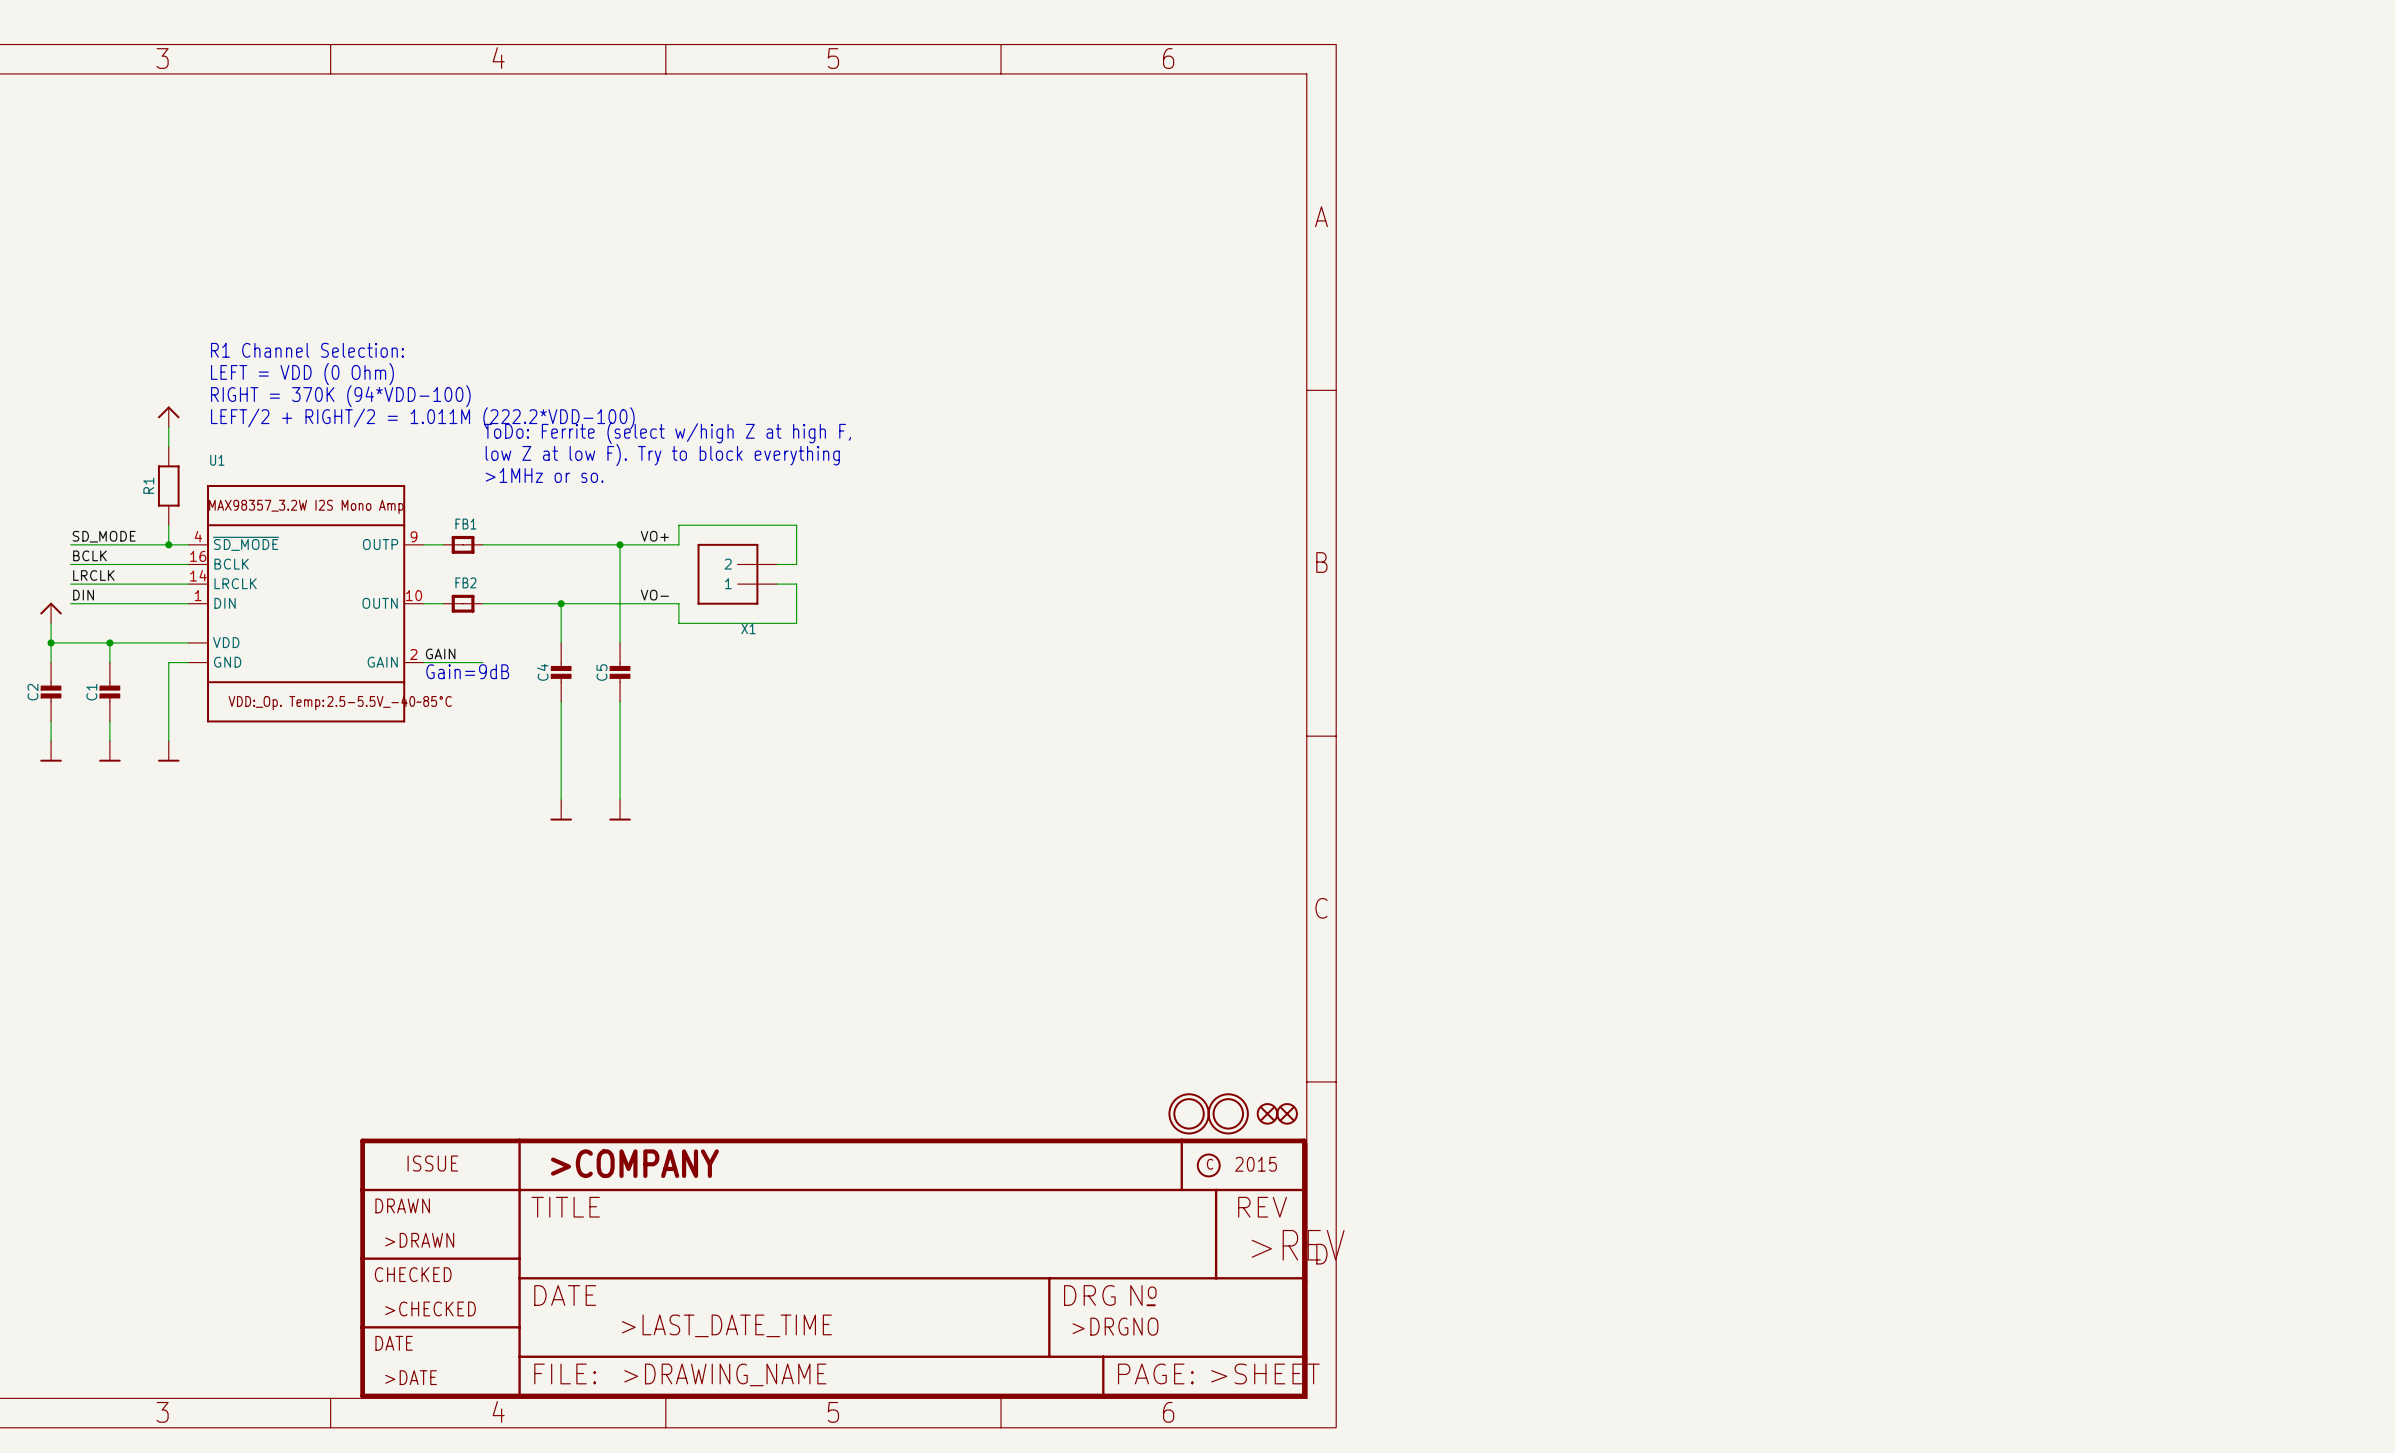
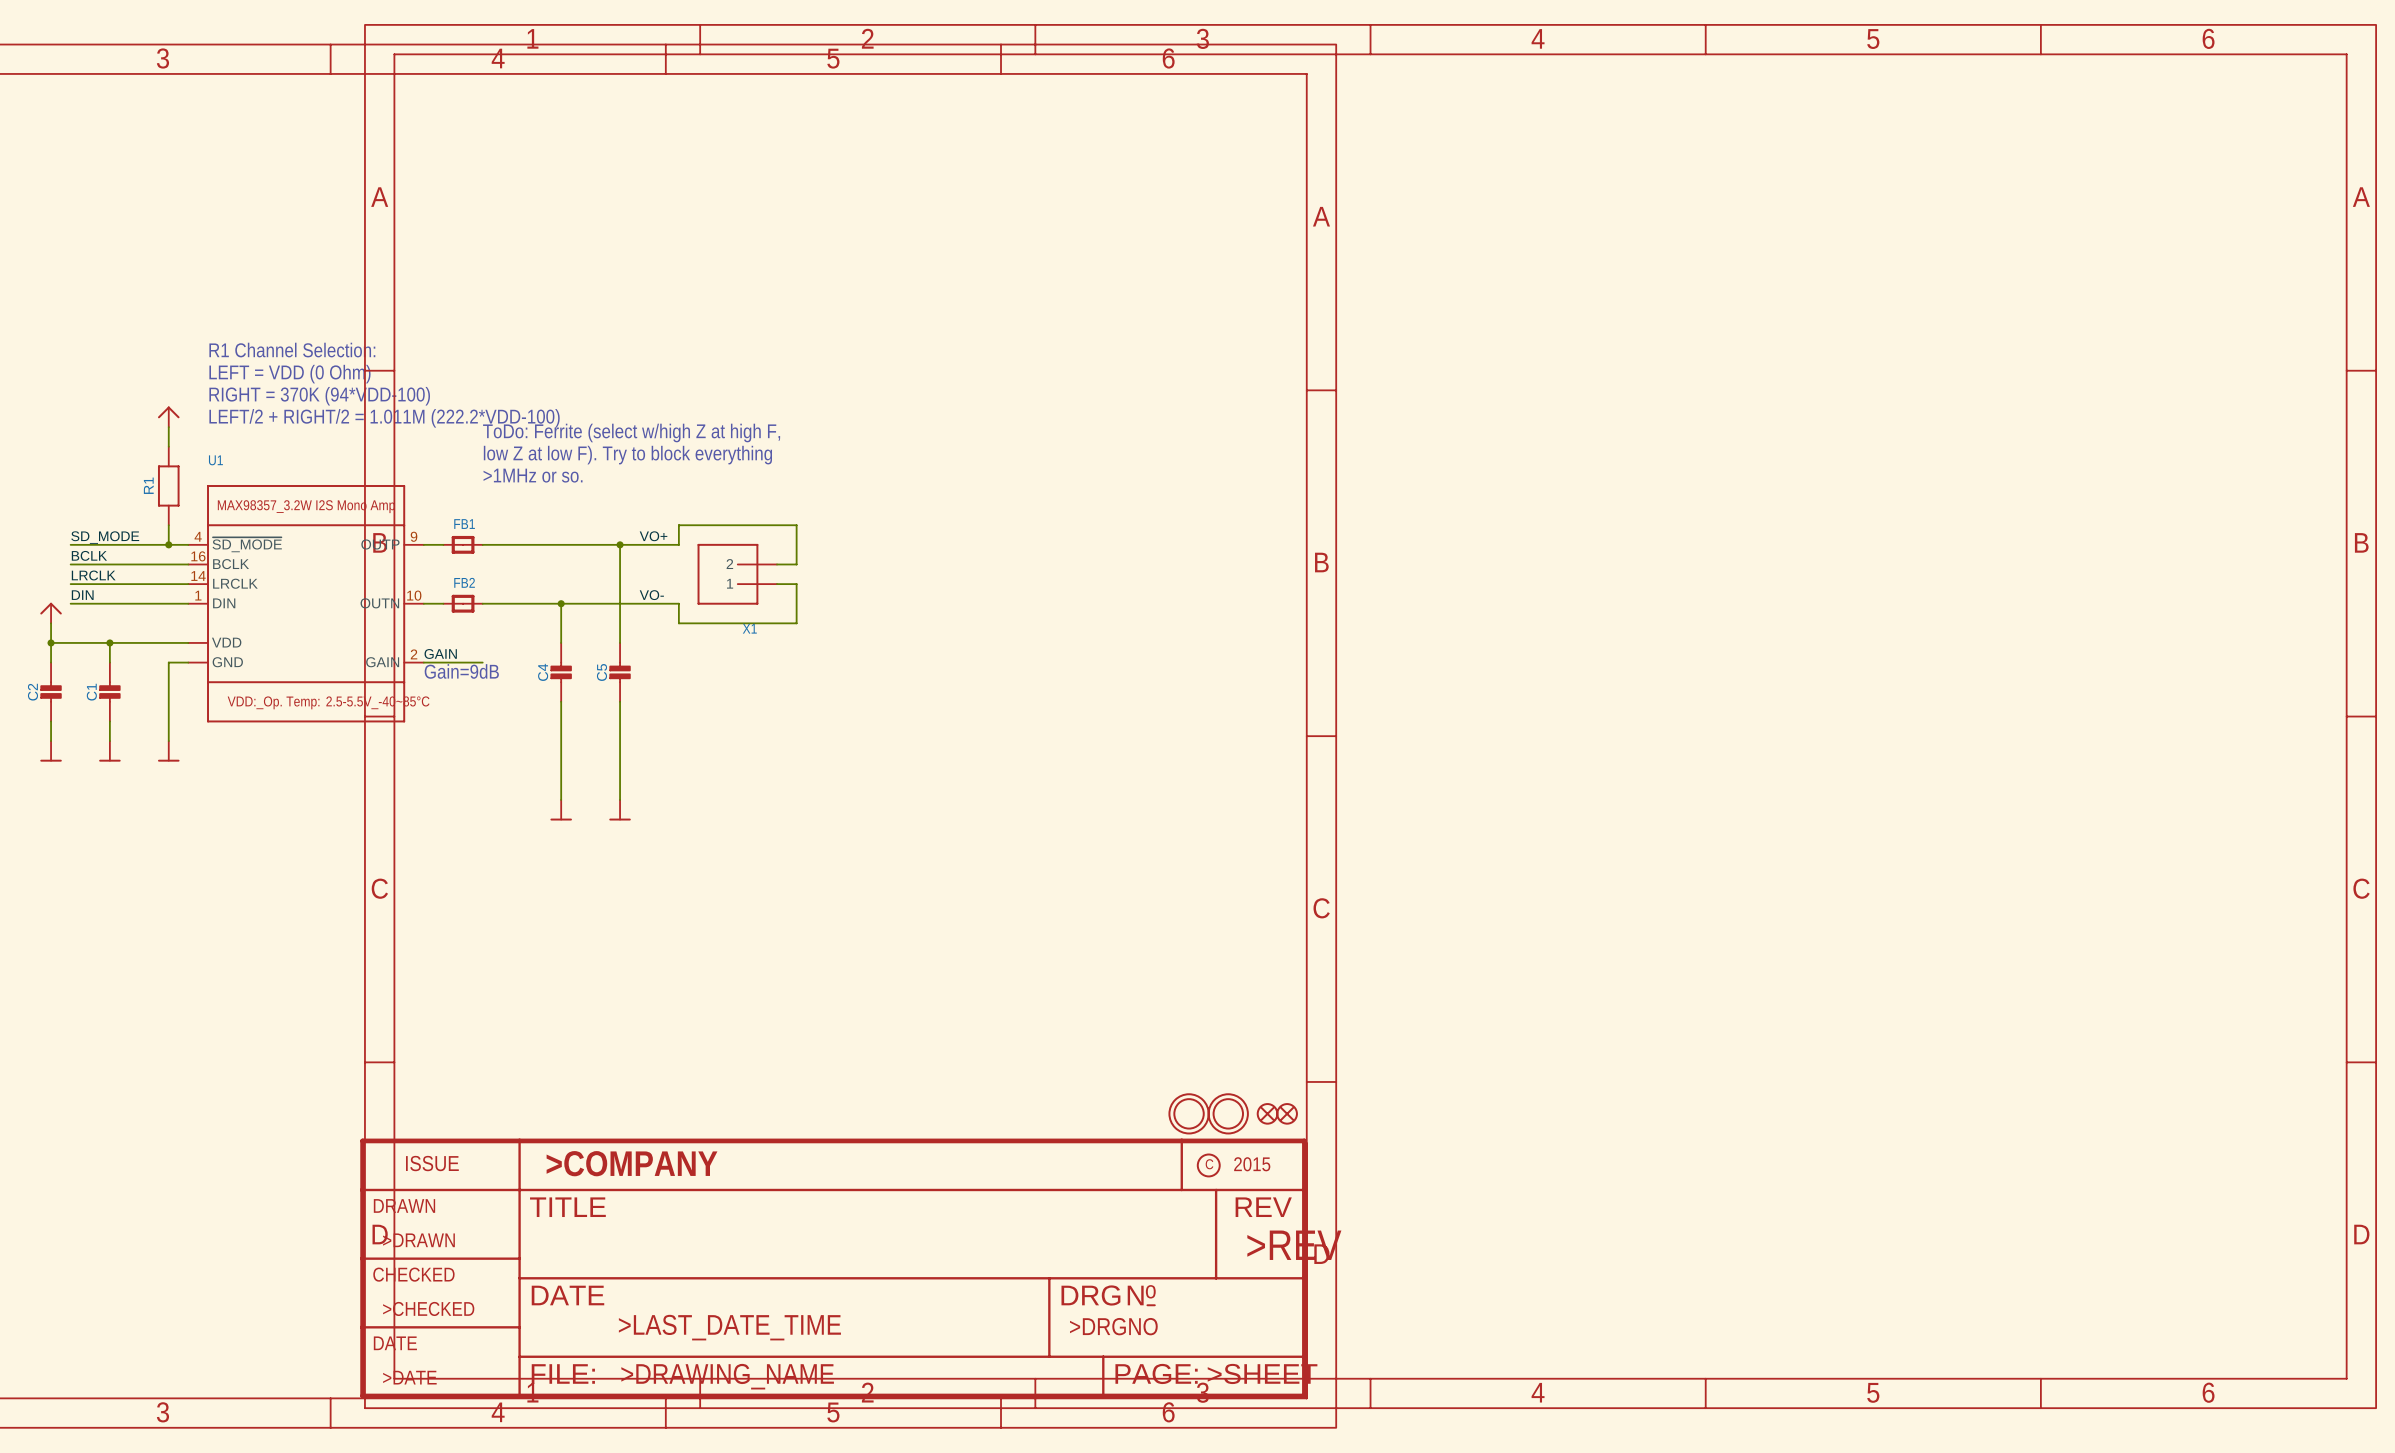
power symbol: none -> (1368, 716)
power symbol: (833, 1268) -> none

